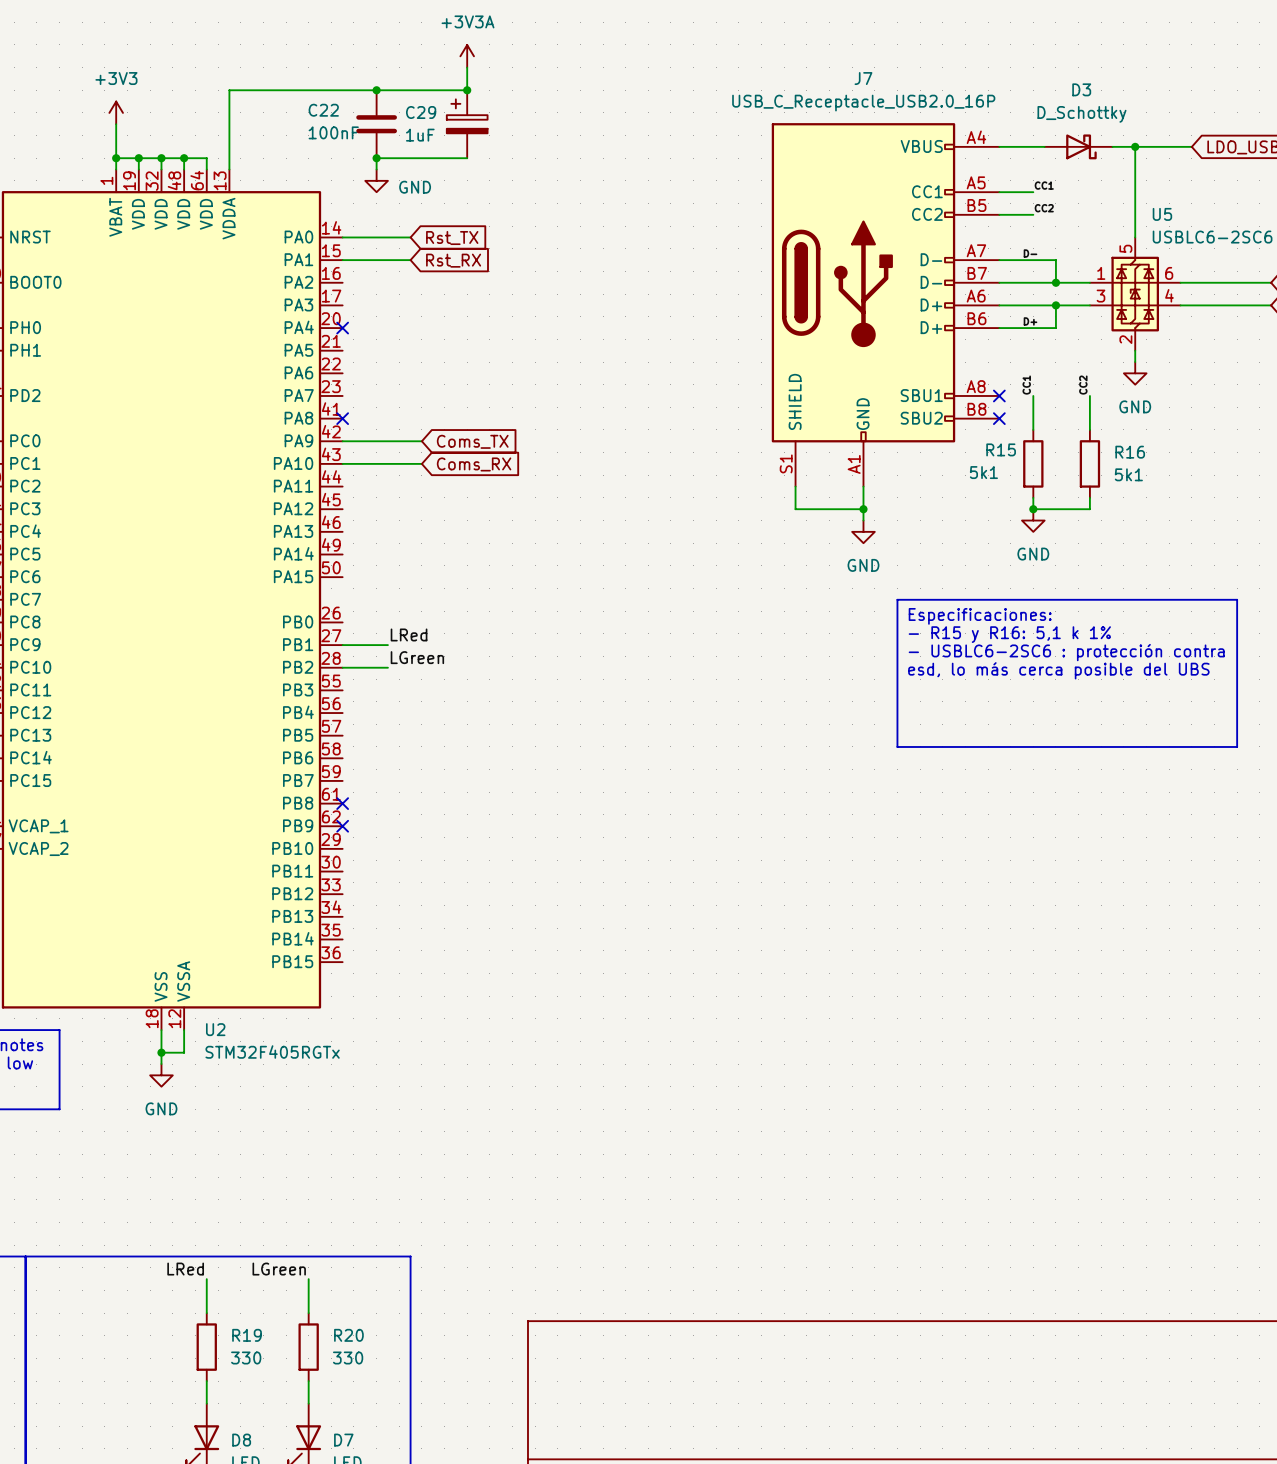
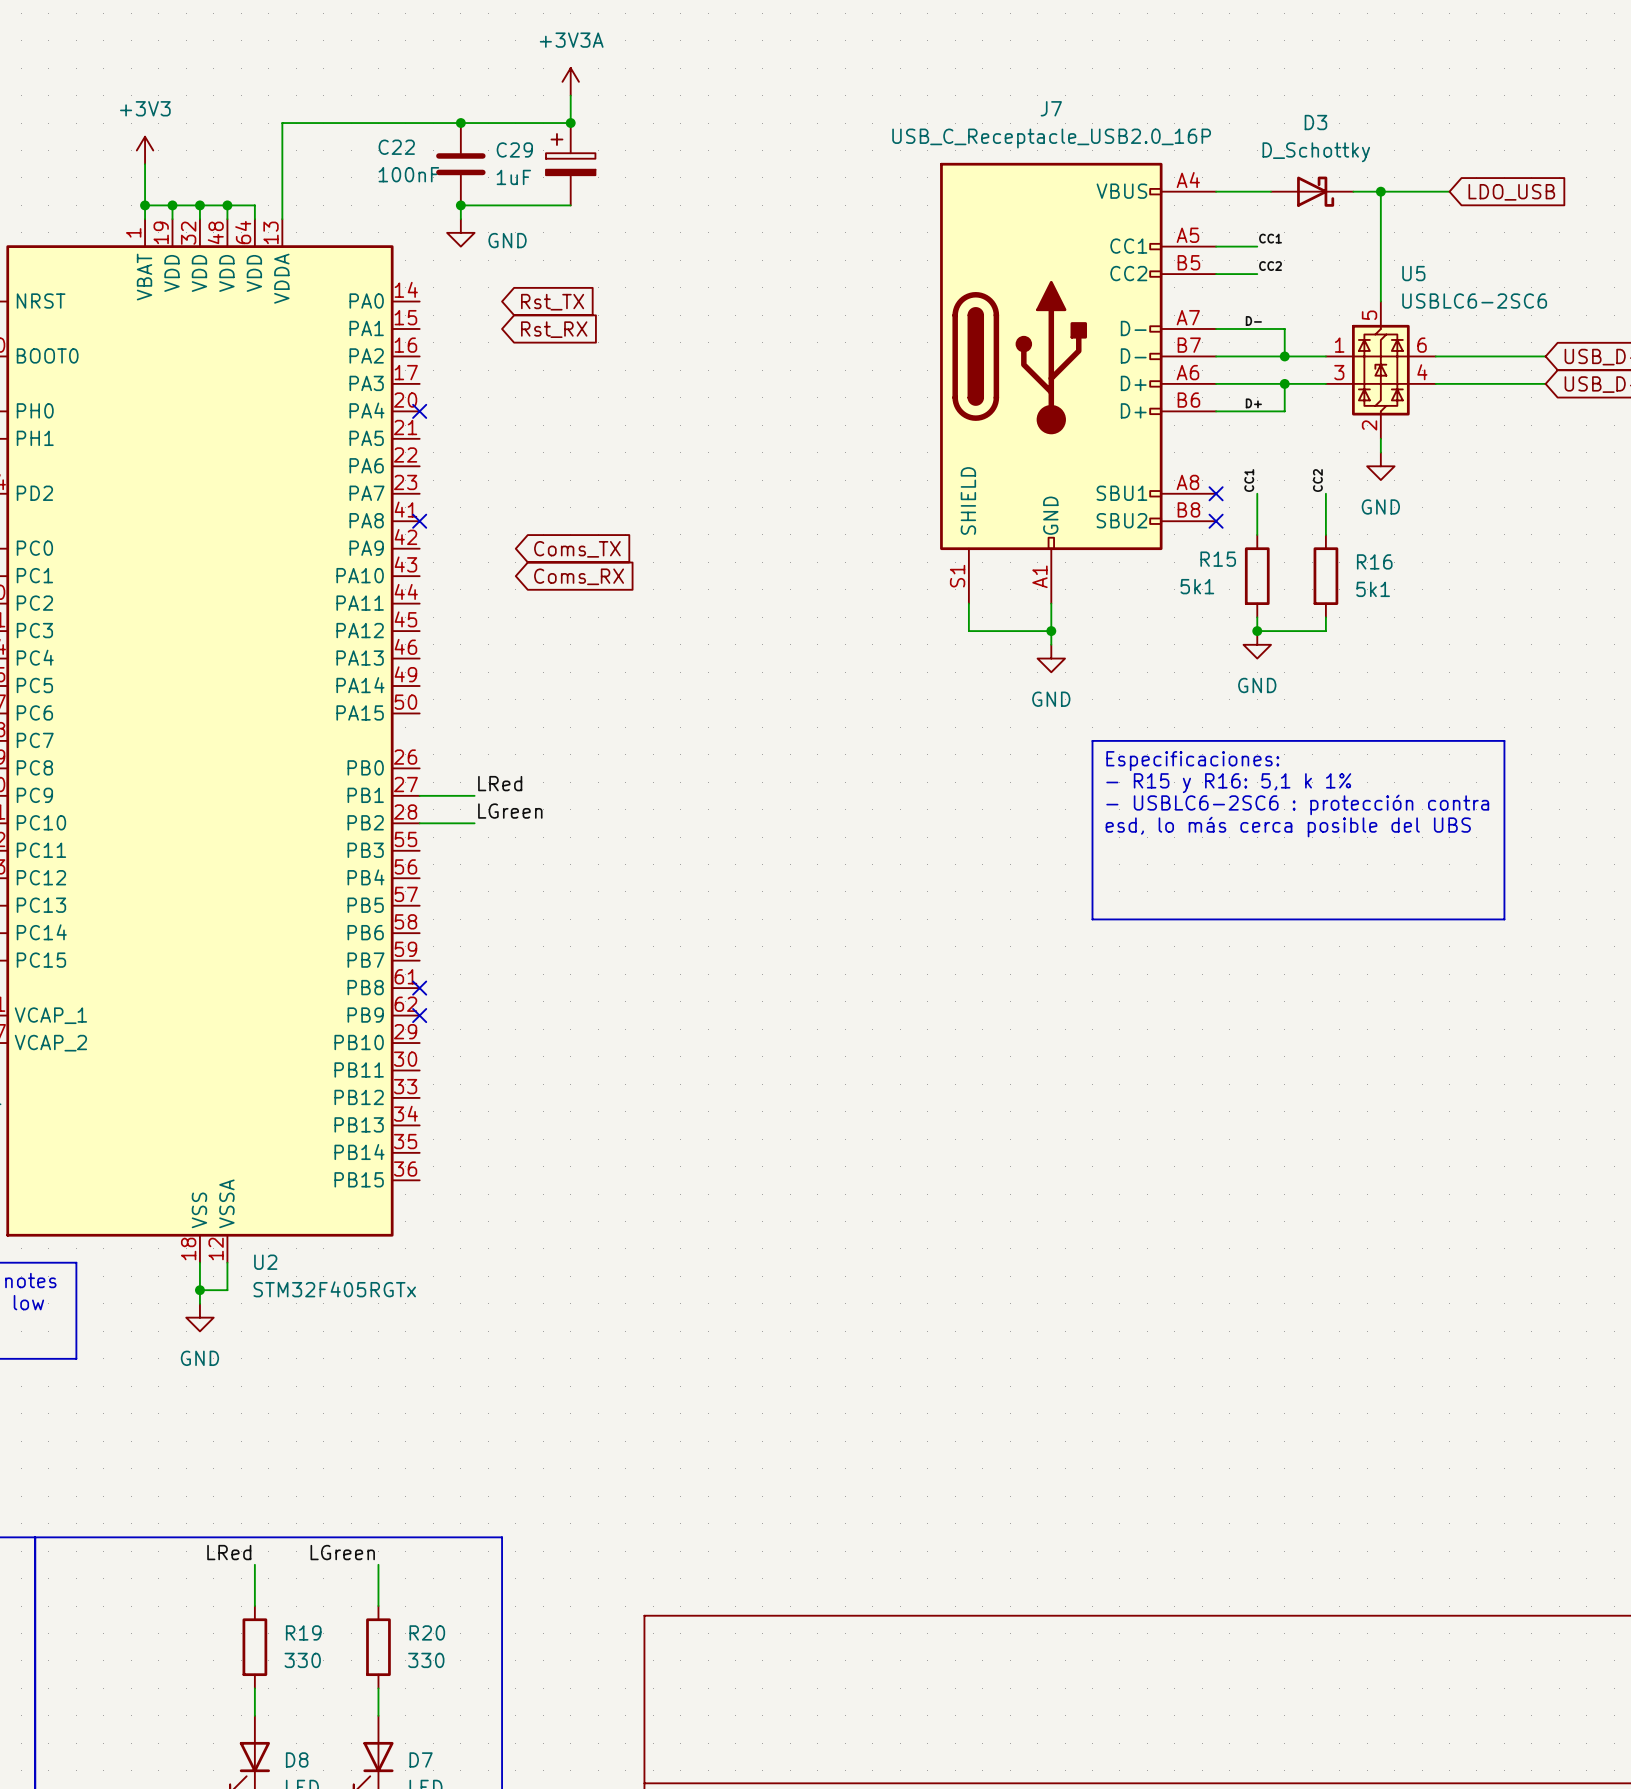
wire: (342, 237) (410, 237) -> none
wire: (342, 260) (410, 260) -> none
wire: (342, 441) (421, 441) -> none
wire: (342, 463) (421, 463) -> none

